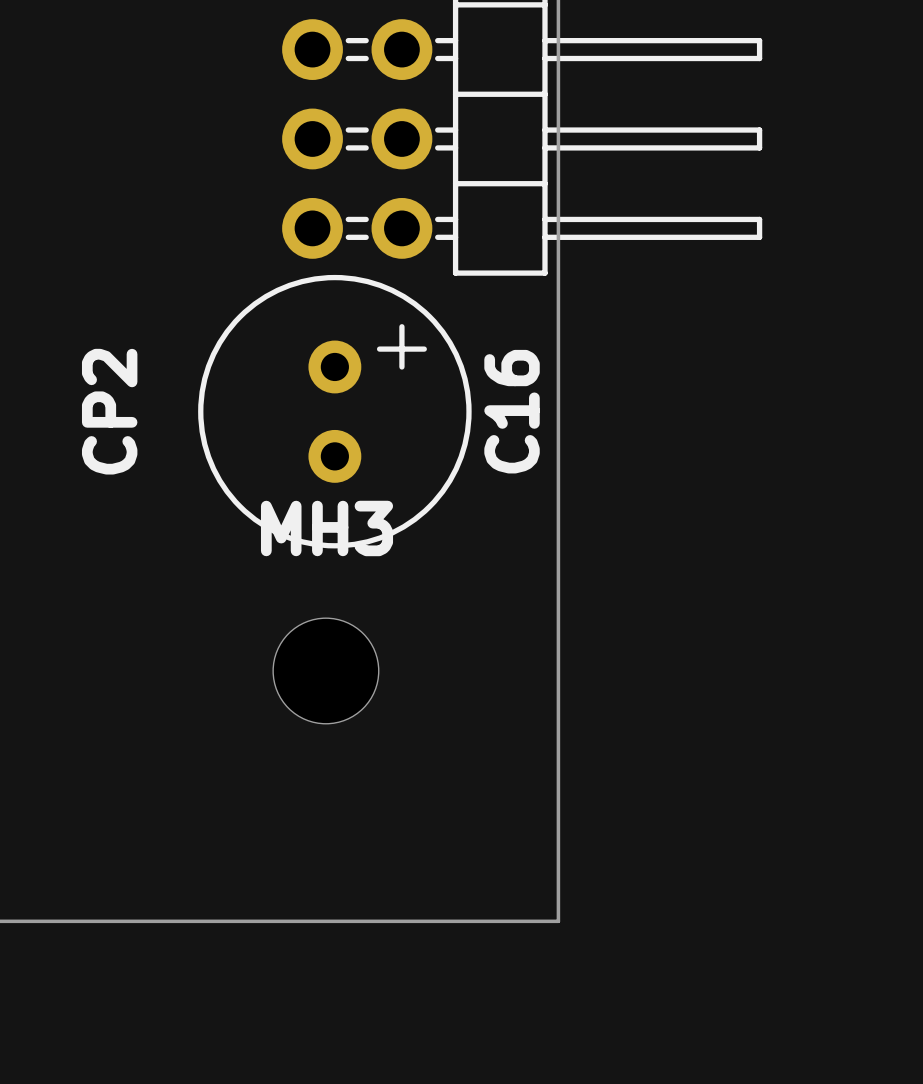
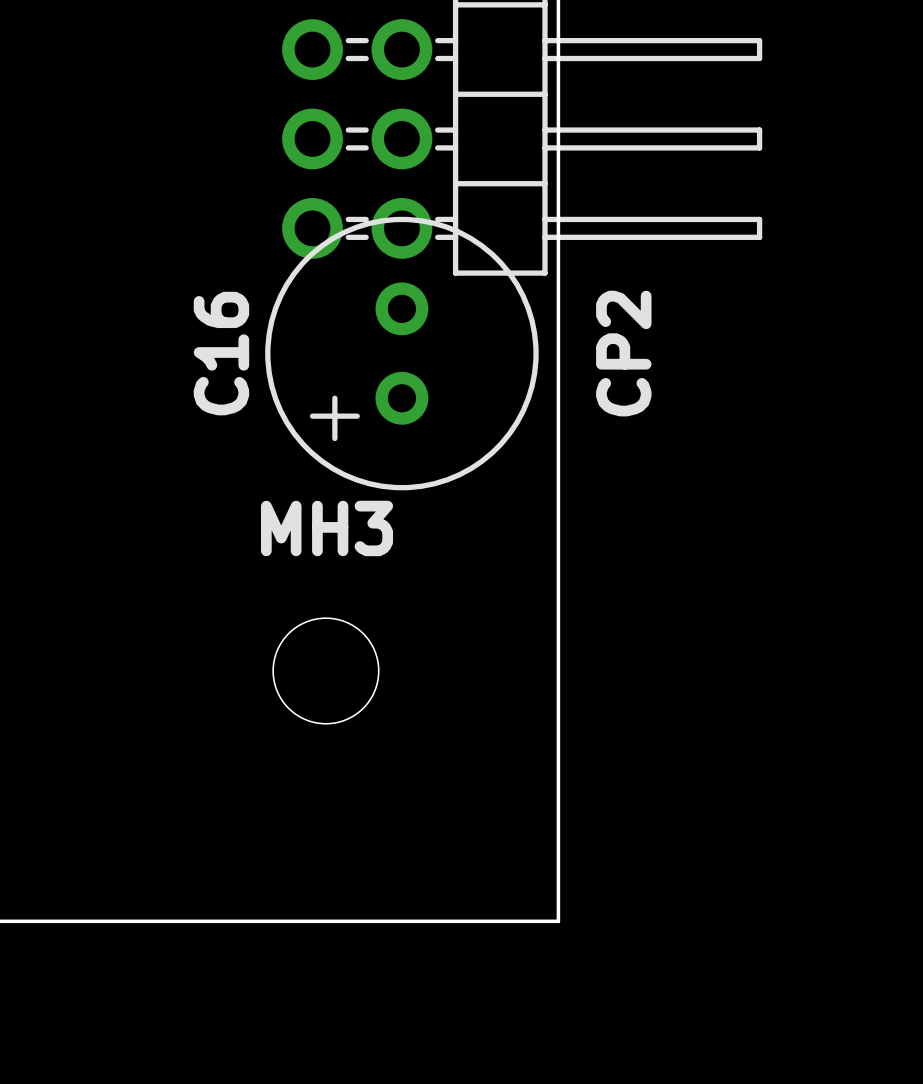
C16 rotation: 0° (334, 411) -> 180° (401, 353)

